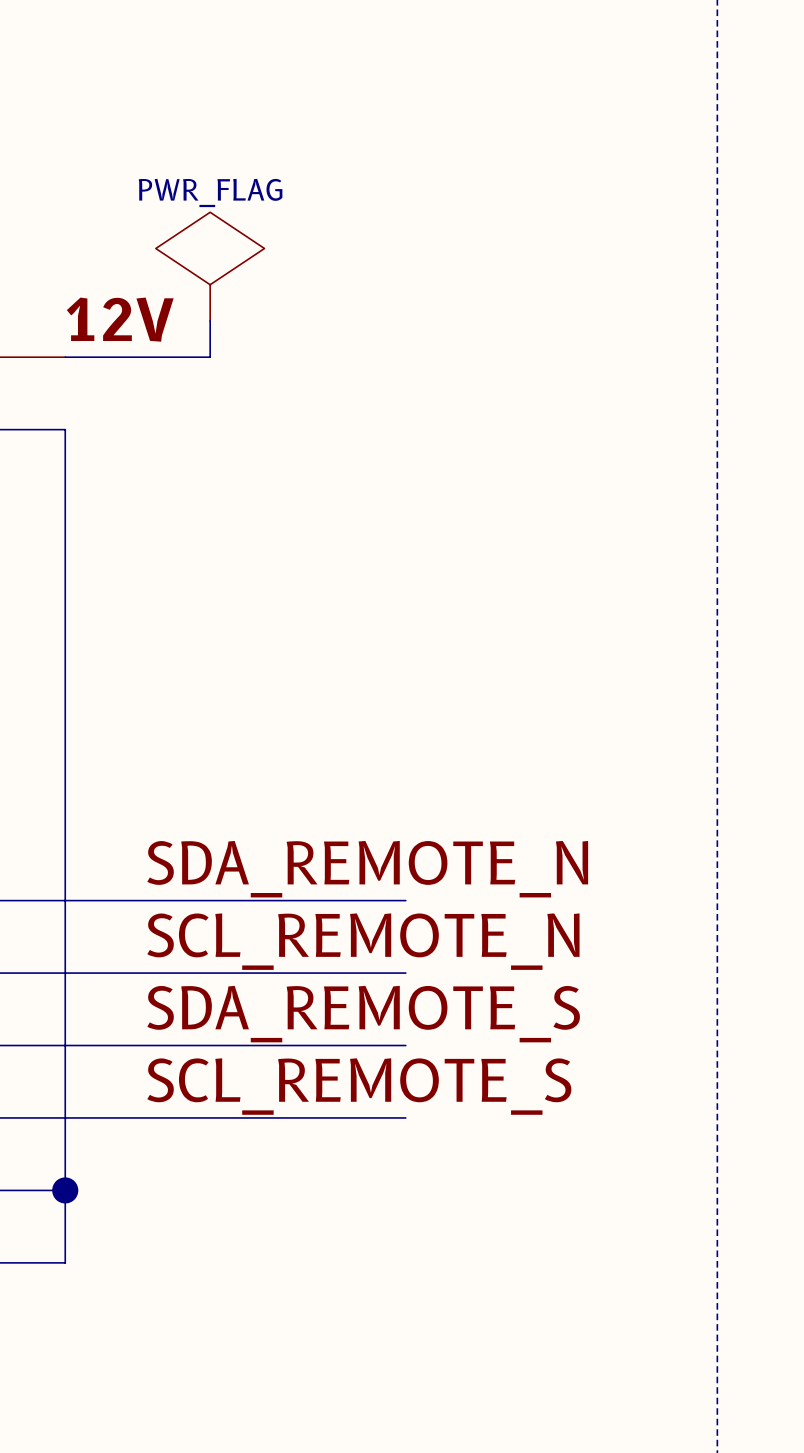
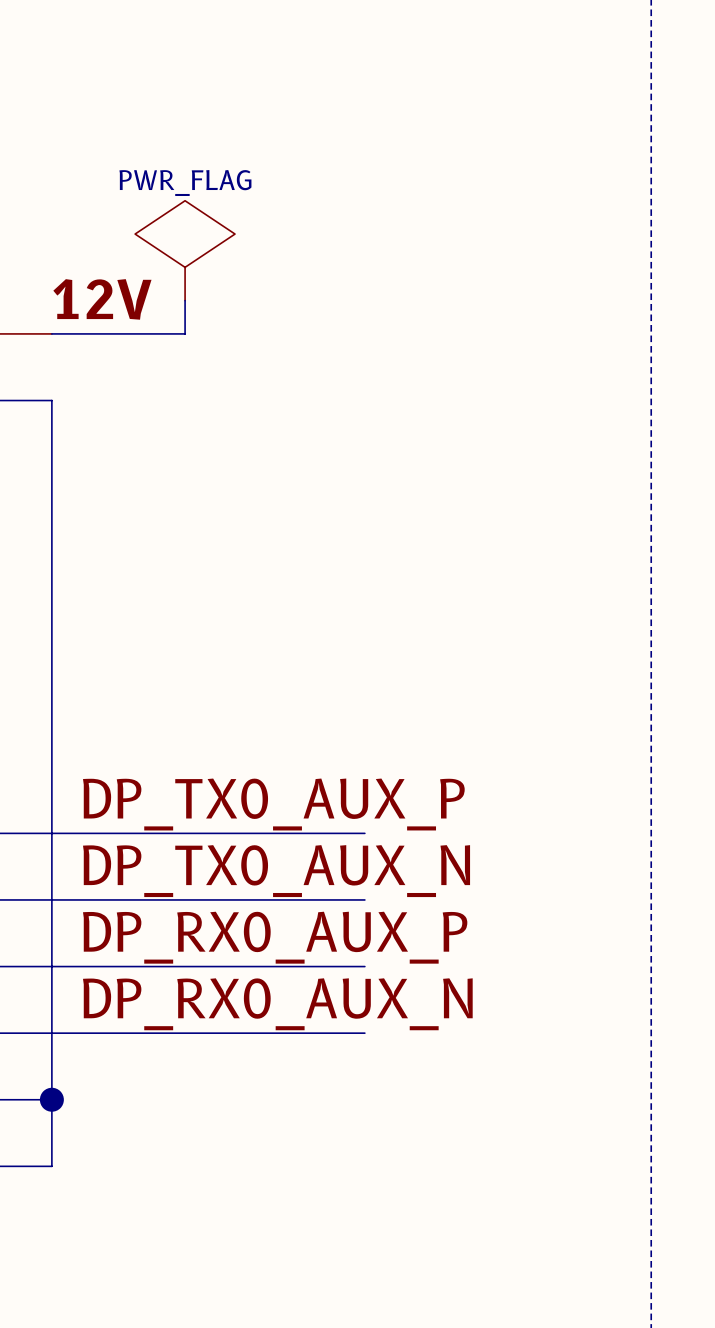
label: none -> DP_TX0_AUX_P (273, 804)
label: SDA_REMOTE_N (367, 869) -> none
label: none -> DP_TX0_AUX_N (276, 871)
label: SCL_REMOTE_N (363, 941) -> none
label: none -> DP_RX0_AUX_P (275, 937)
label: SDA_REMOTE_S (363, 1014) -> none
label: none -> DP_RX0_AUX_N (277, 1004)
label: SCL_REMOTE_S (359, 1086) -> none

